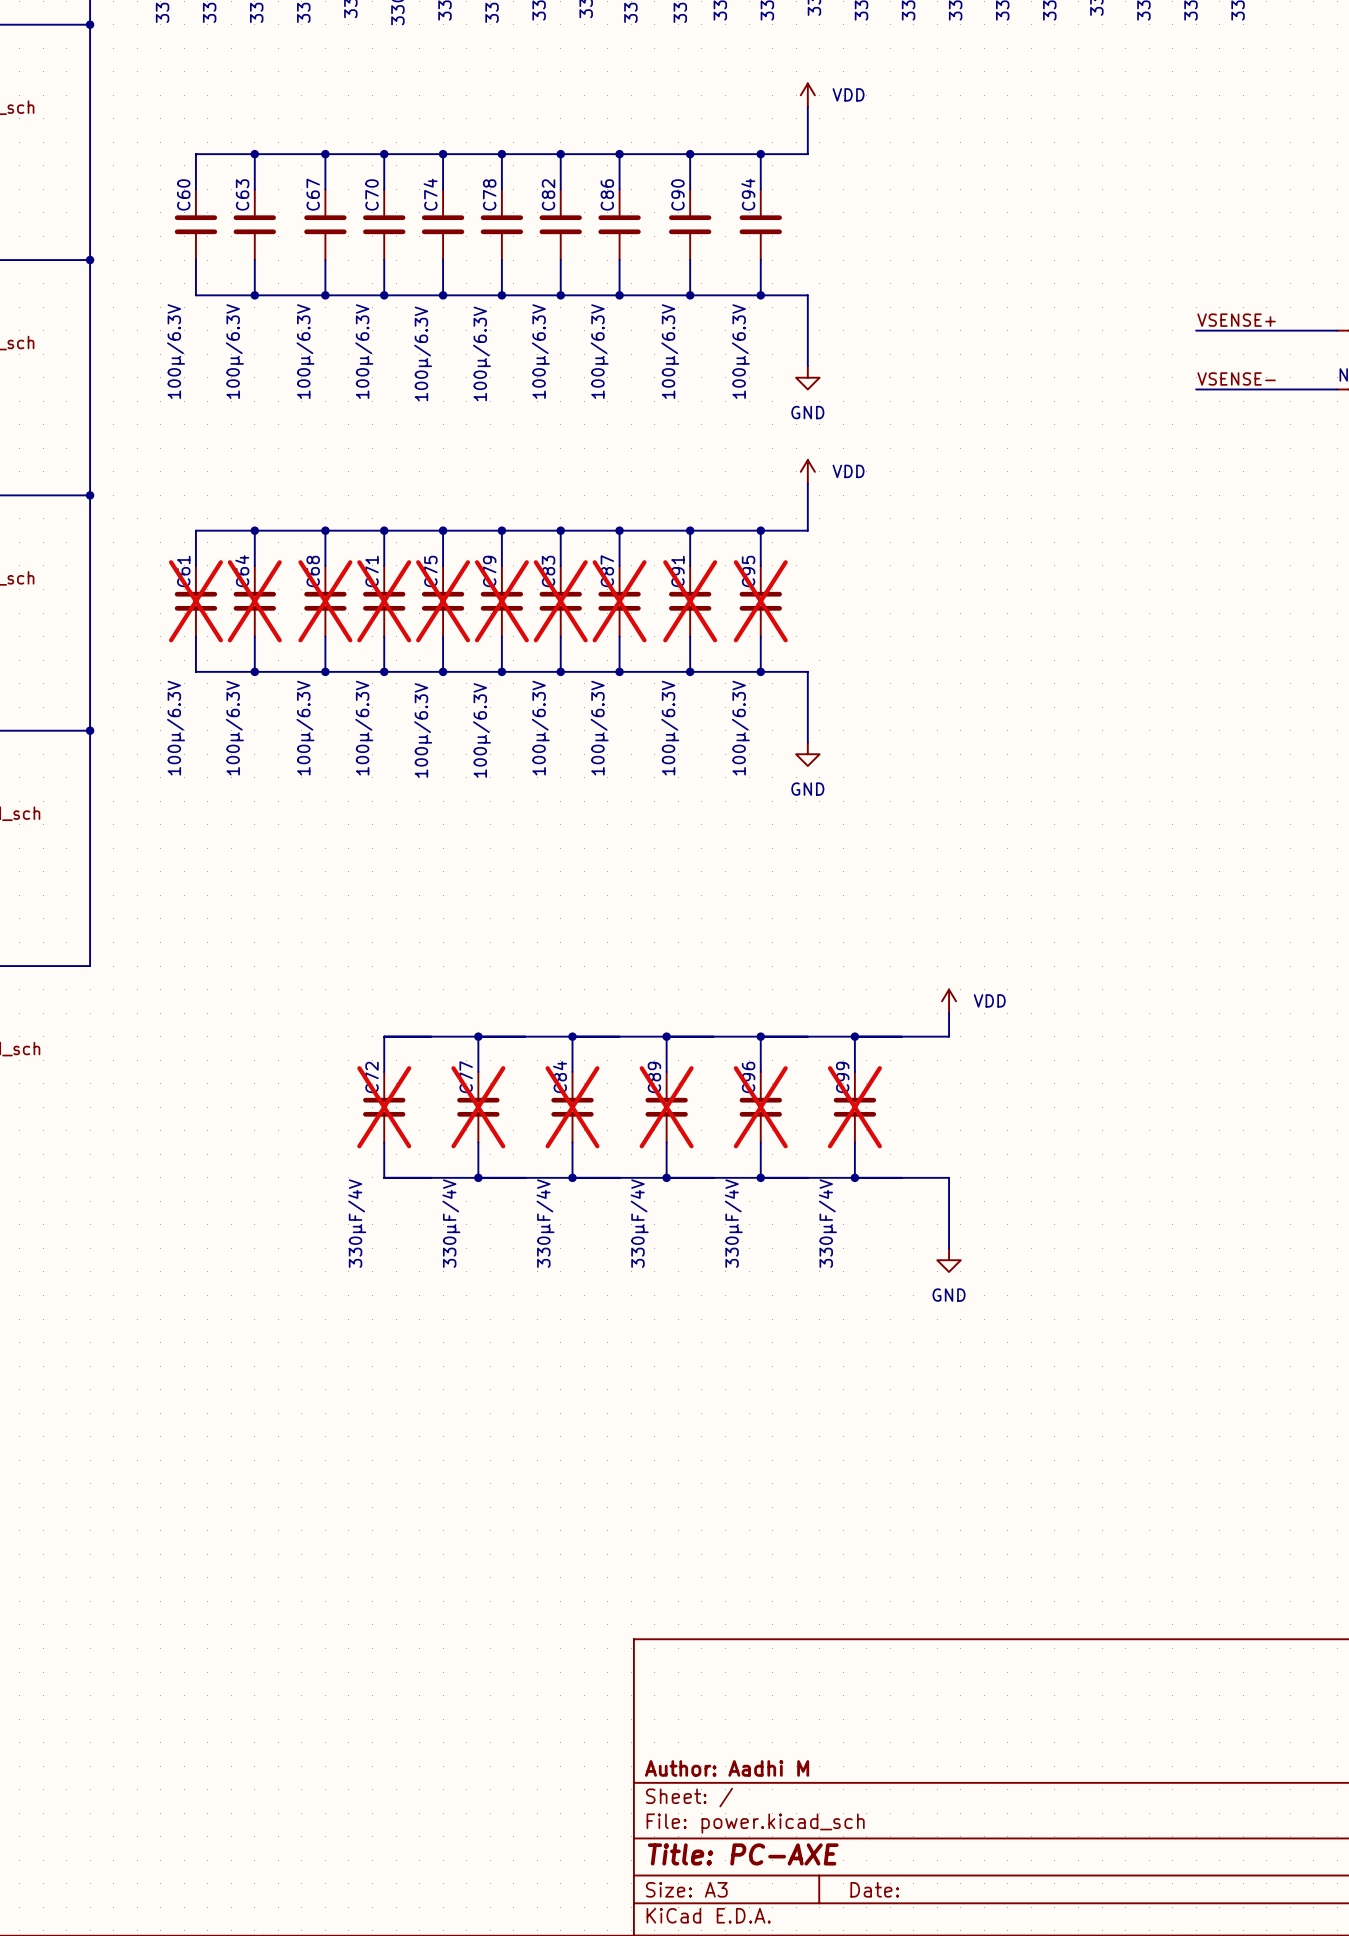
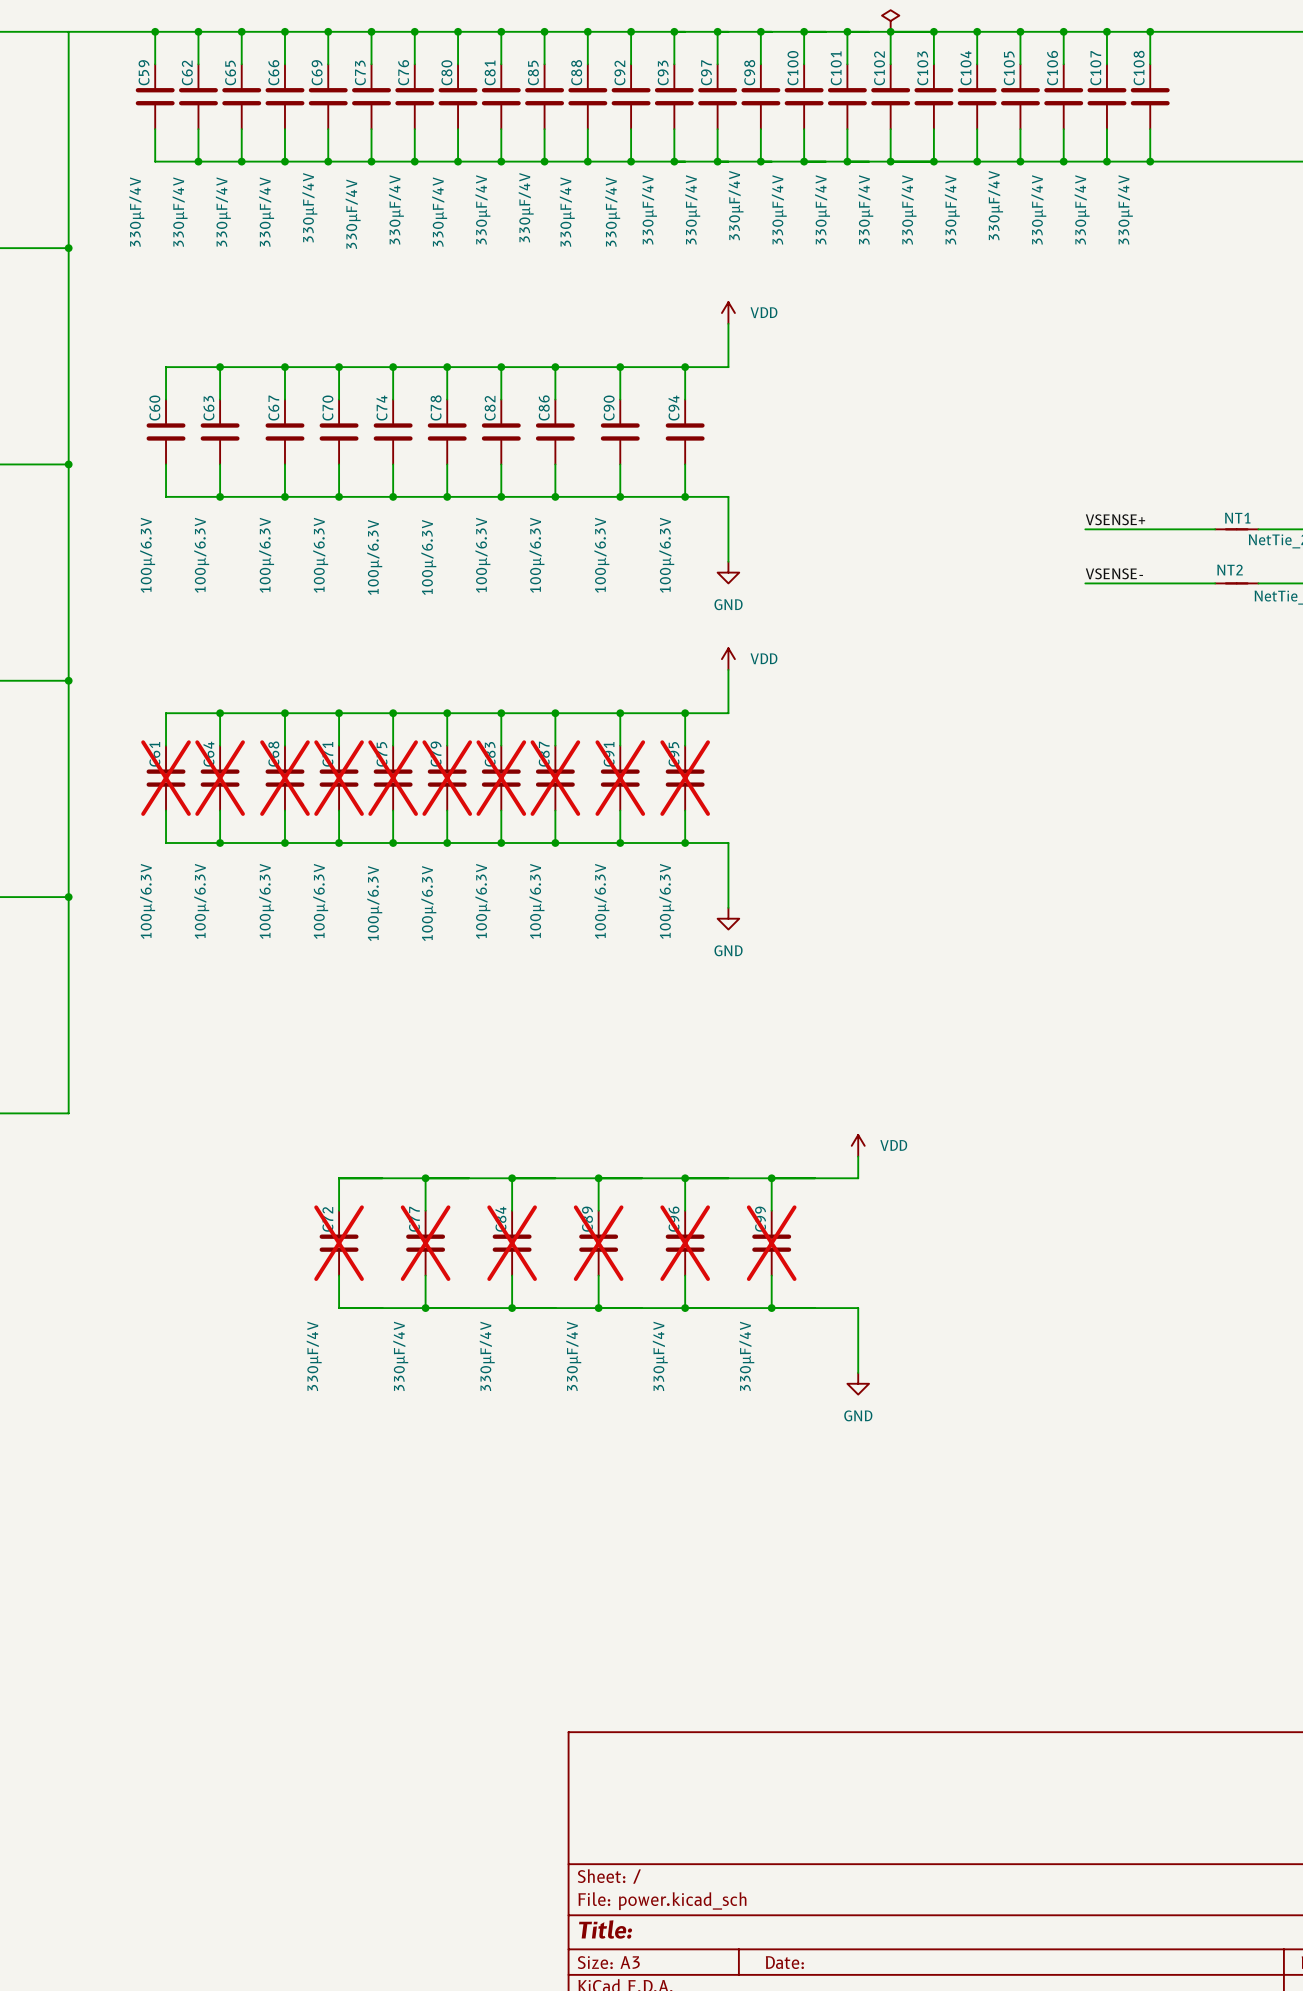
title block: Author: Aadhi M (727, 1768) -> none
title block: Title: PC-AXE (743, 1854) -> Title: (605, 1929)

